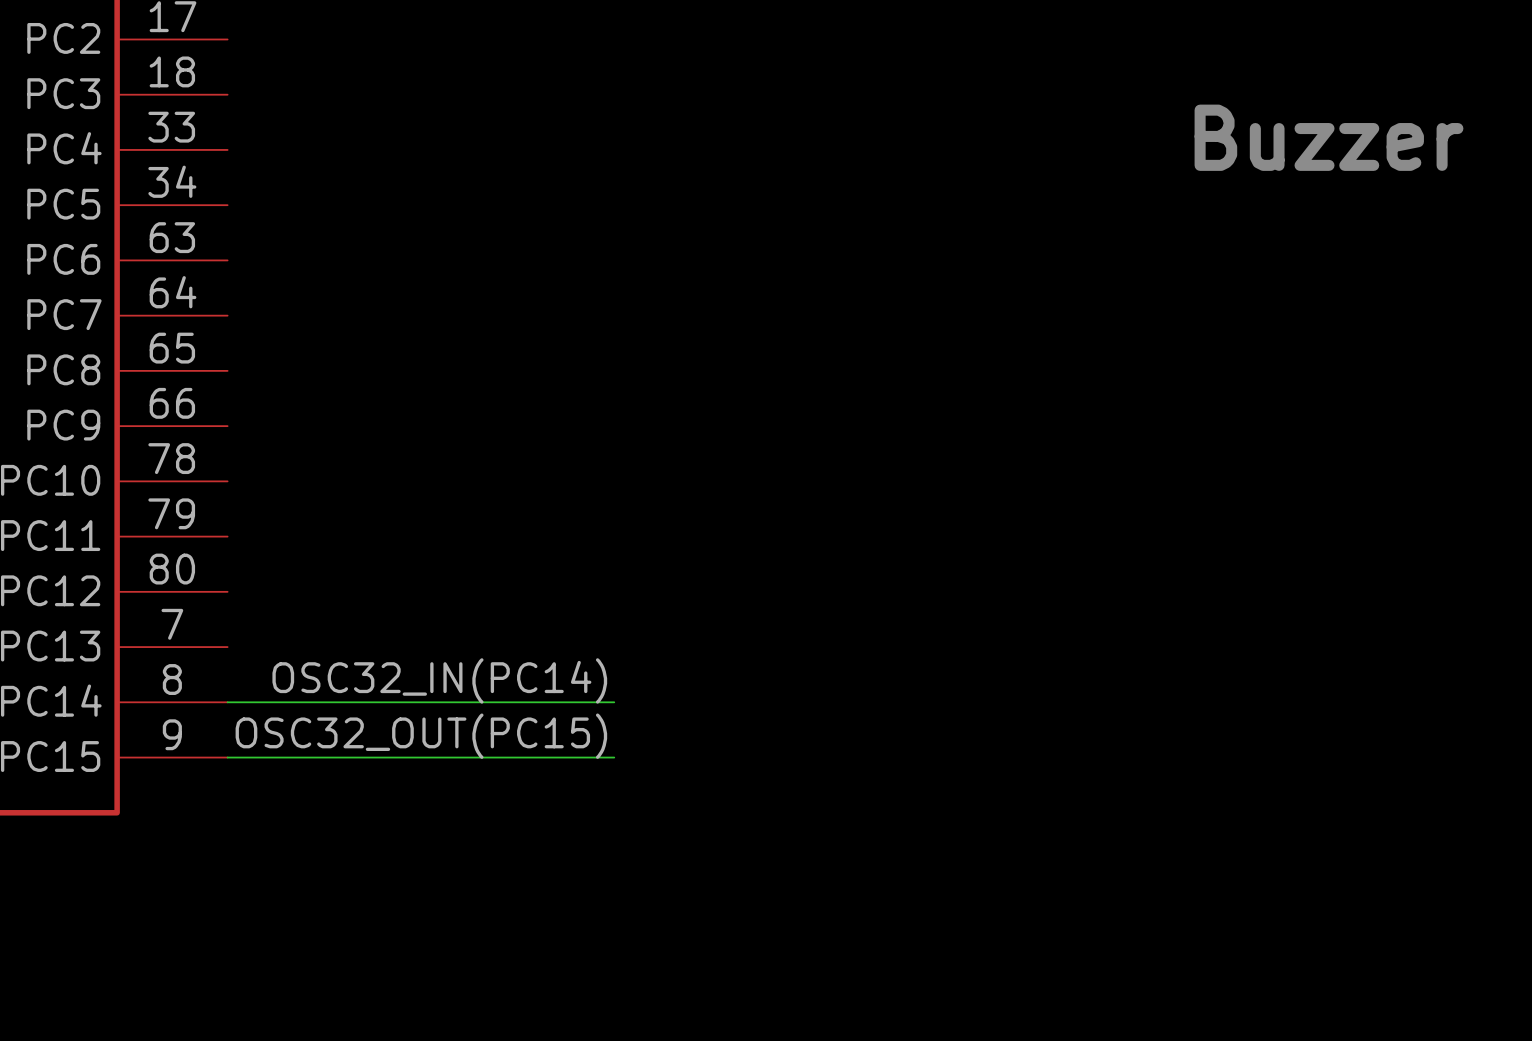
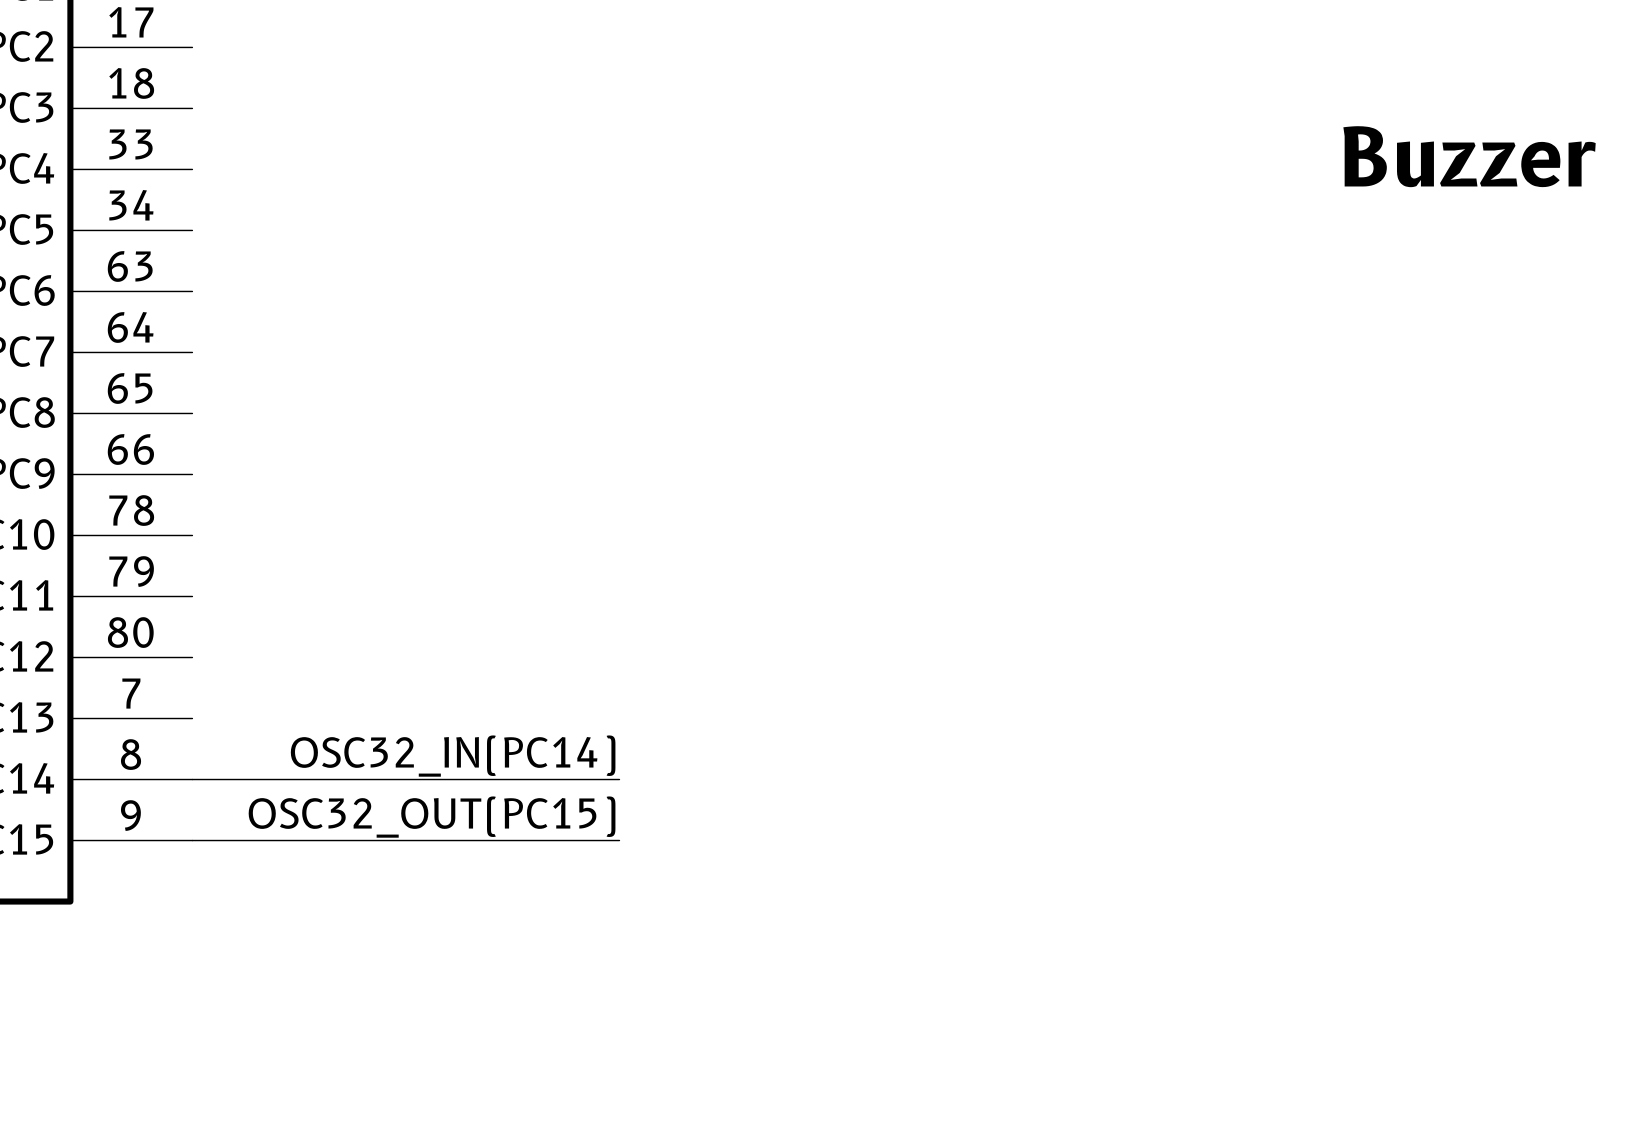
text position: Buzzer (1328, 137) -> Buzzer (1469, 156)

